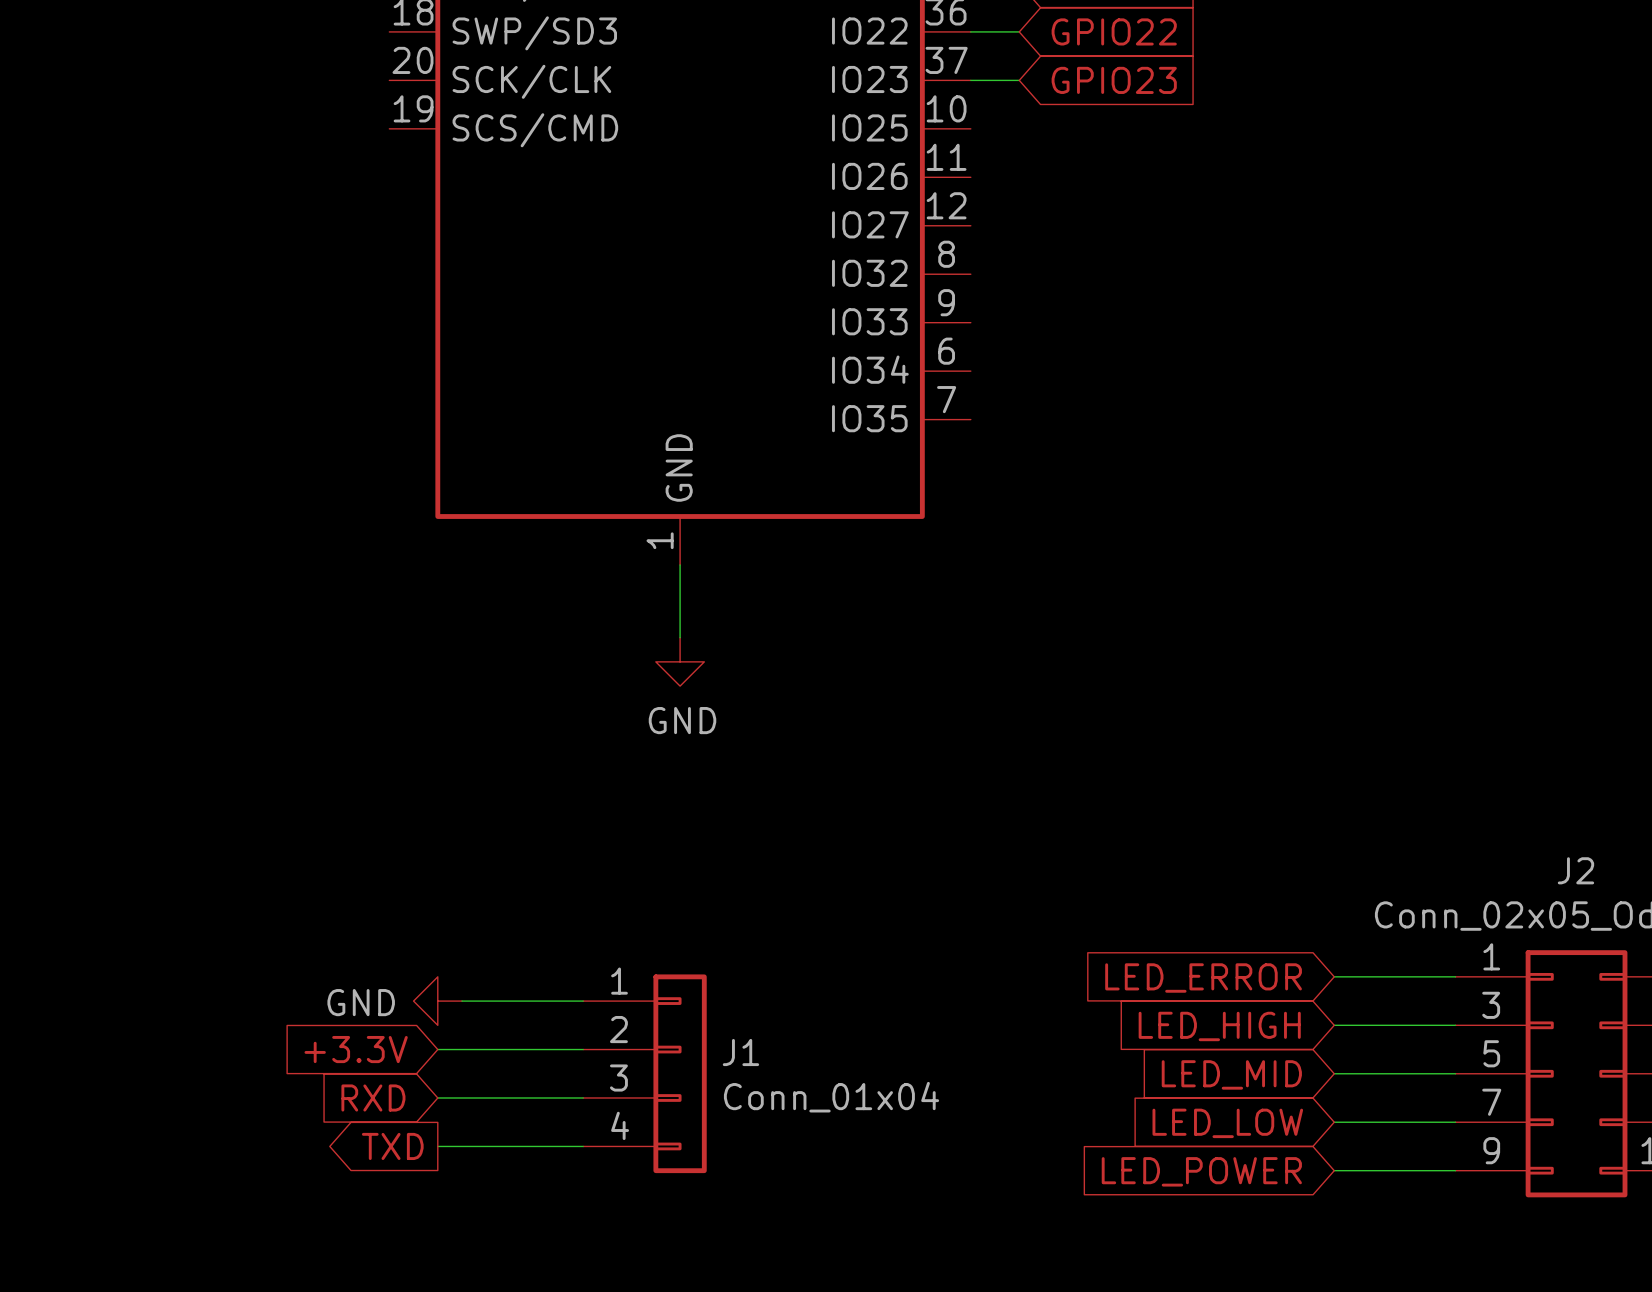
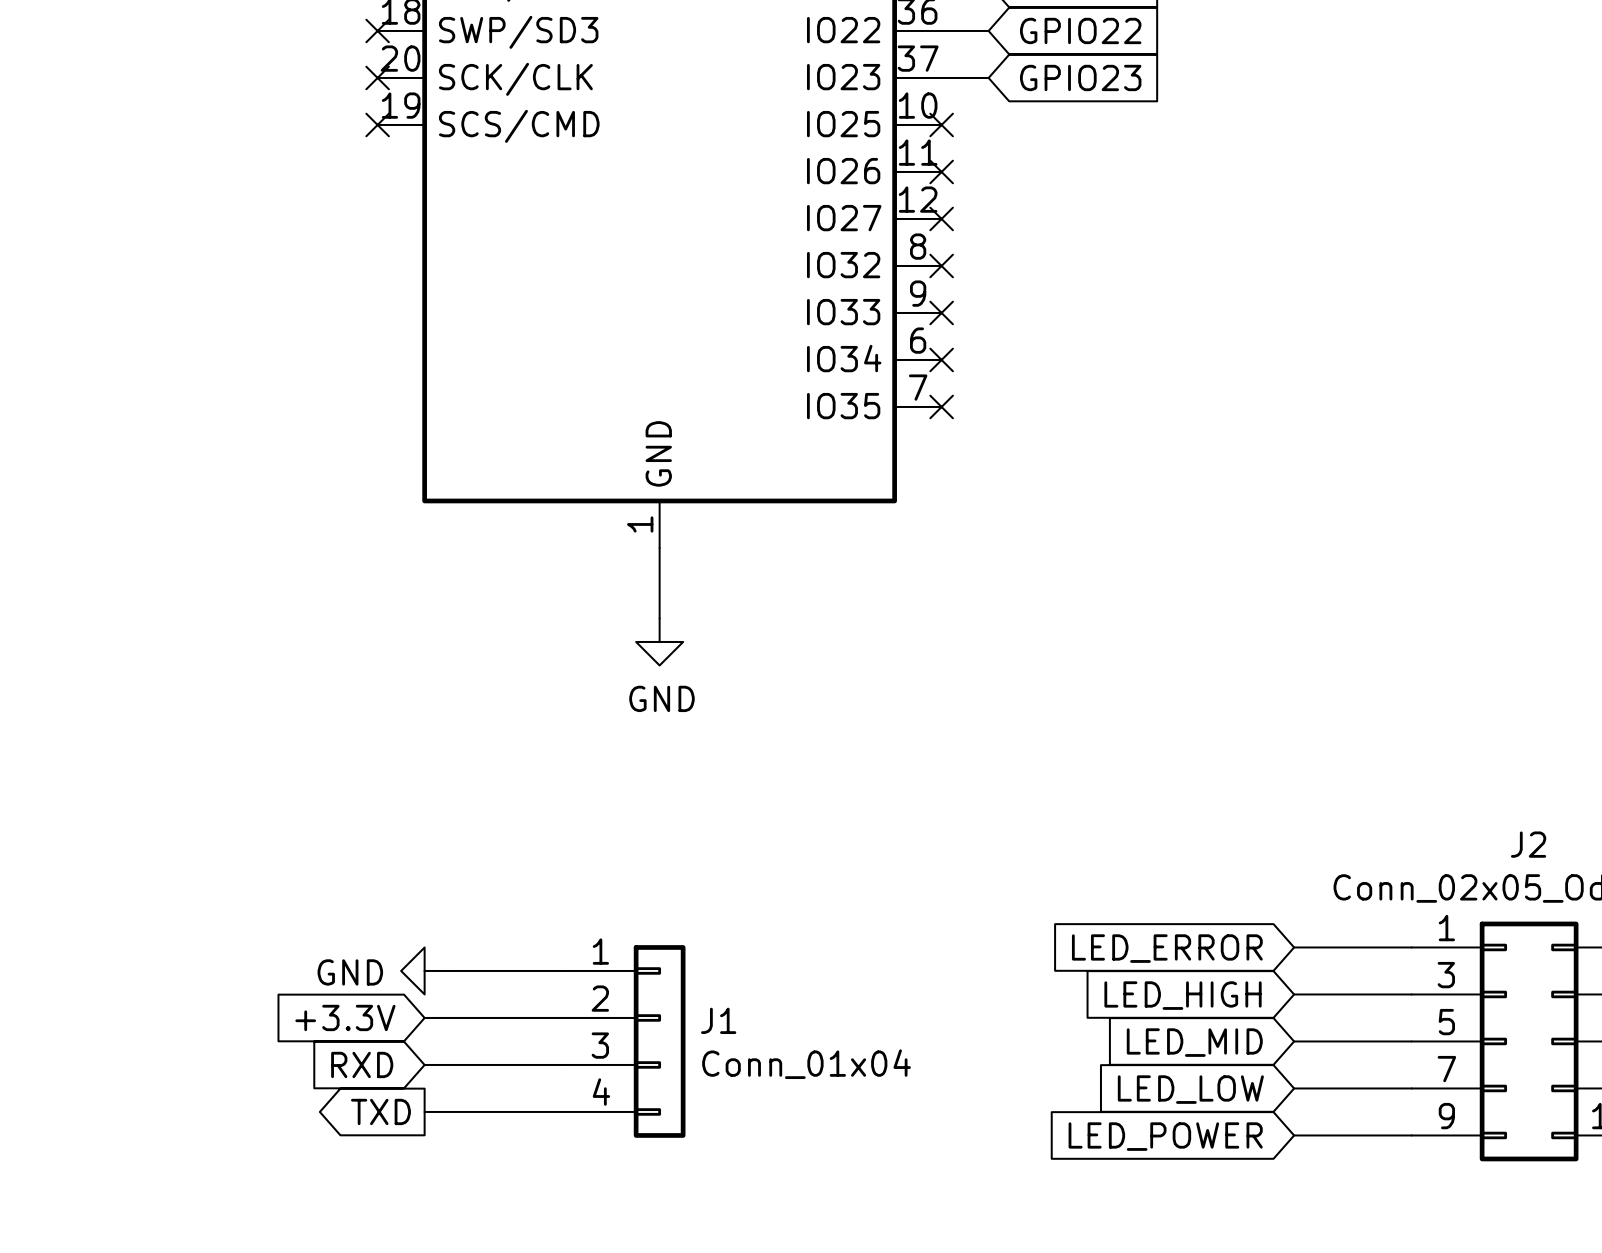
no-connect mark: none -> (377, 30)
no-connect mark: none -> (377, 77)
no-connect mark: none -> (377, 124)
no-connect mark: none -> (941, 124)
no-connect mark: none -> (941, 171)
no-connect mark: none -> (941, 218)
no-connect mark: none -> (941, 265)
no-connect mark: none -> (941, 312)
no-connect mark: none -> (941, 359)
no-connect mark: none -> (941, 406)

